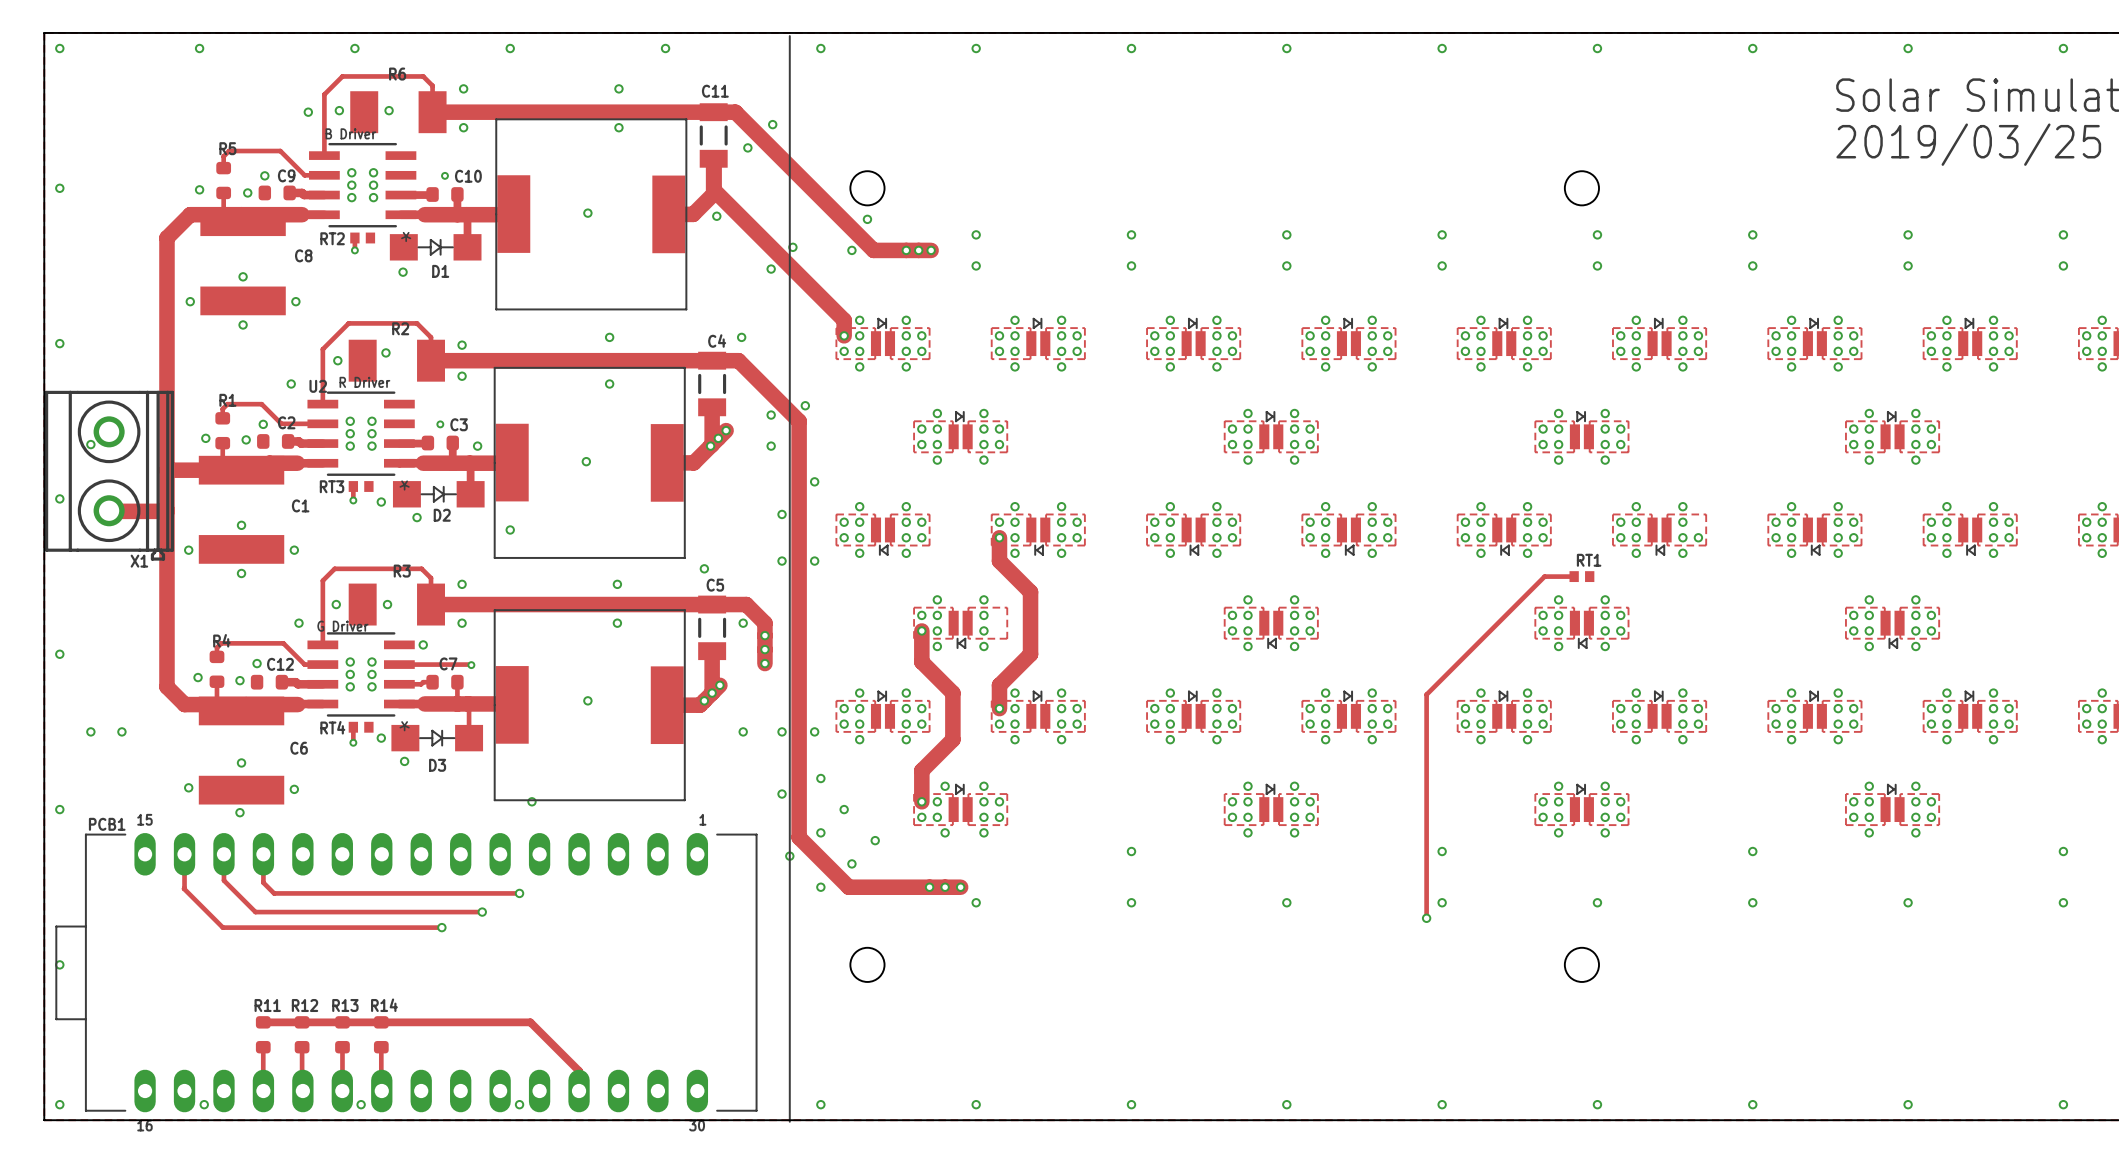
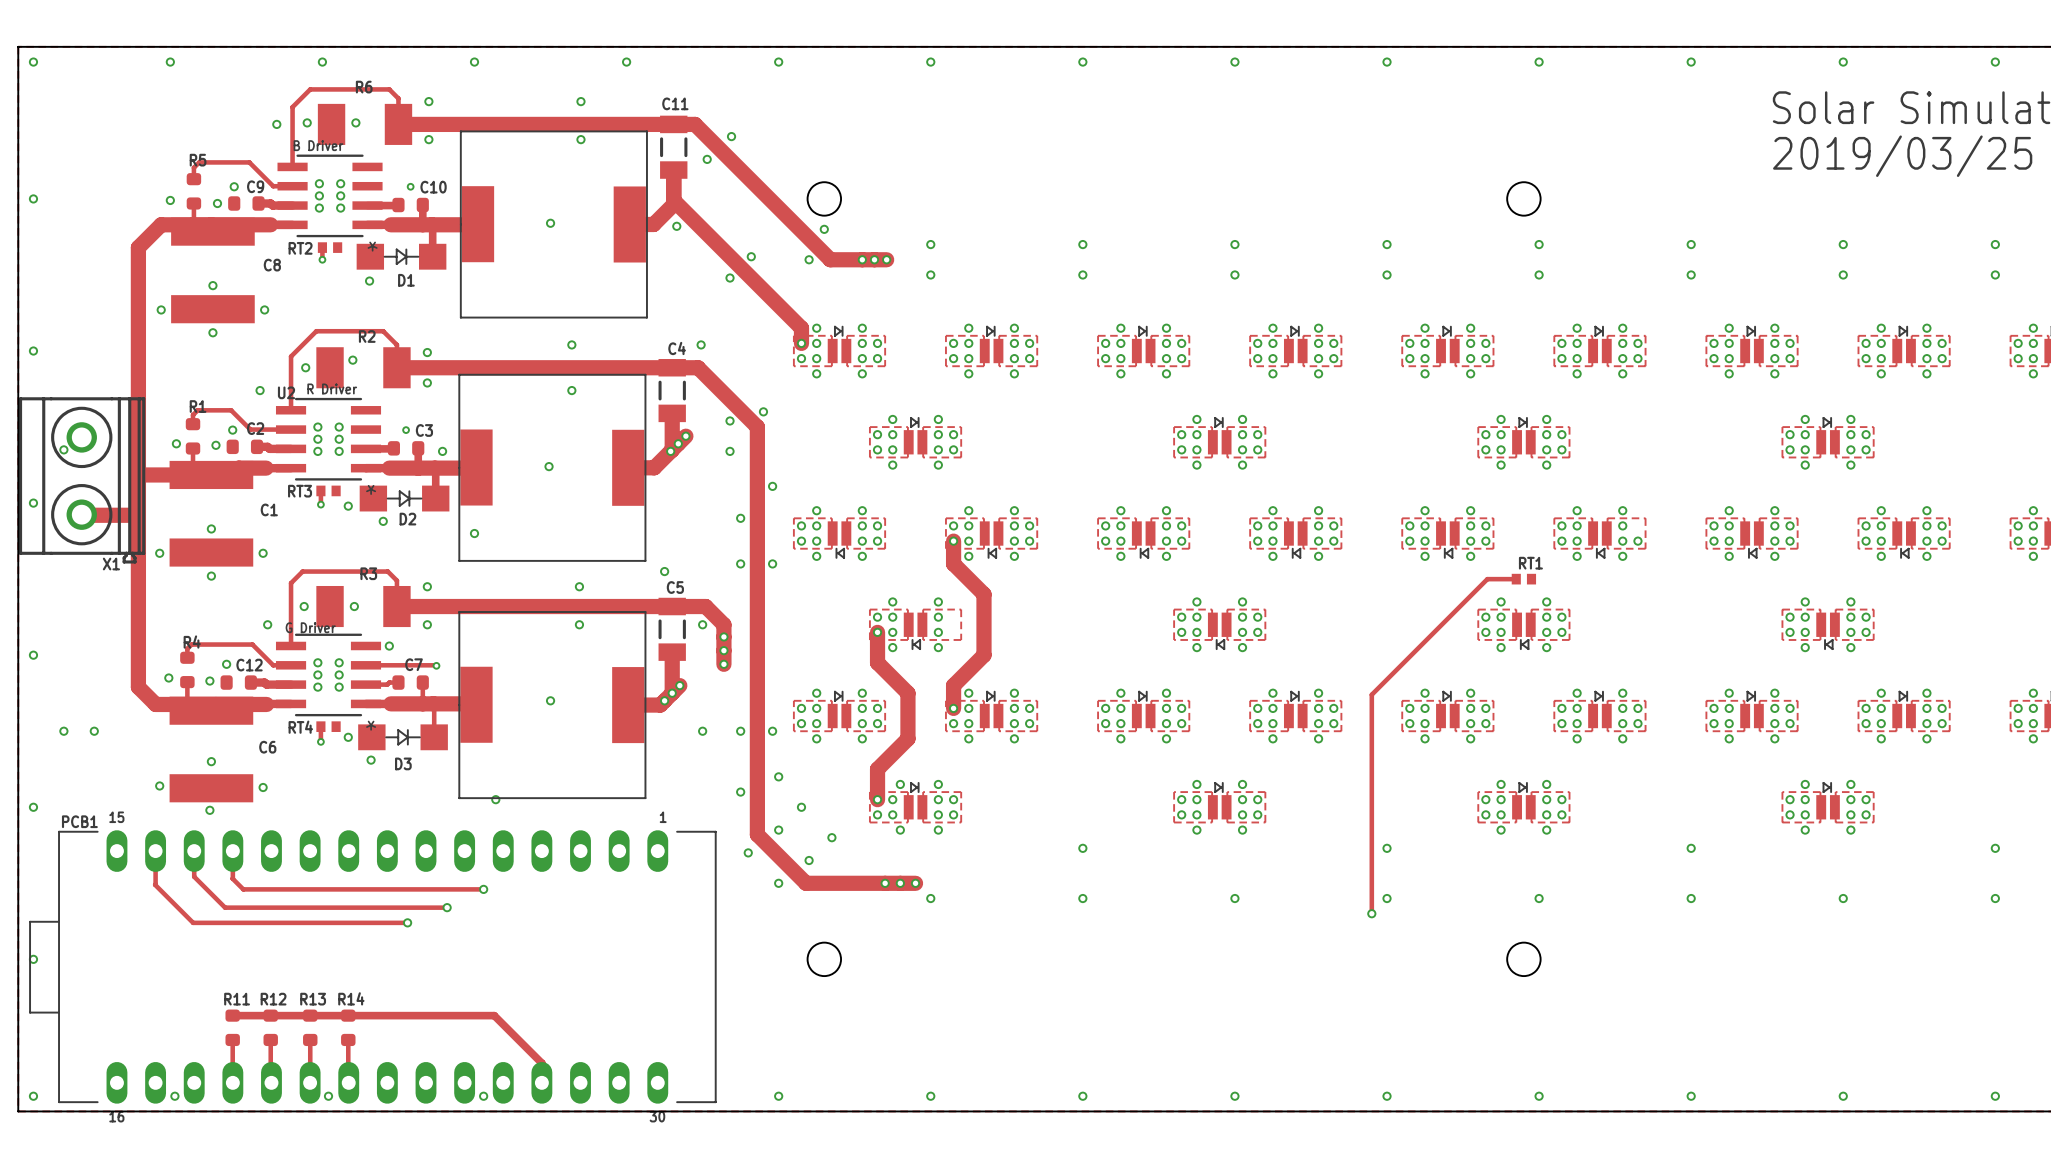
line: (789, 36) (789, 1121) -> none

